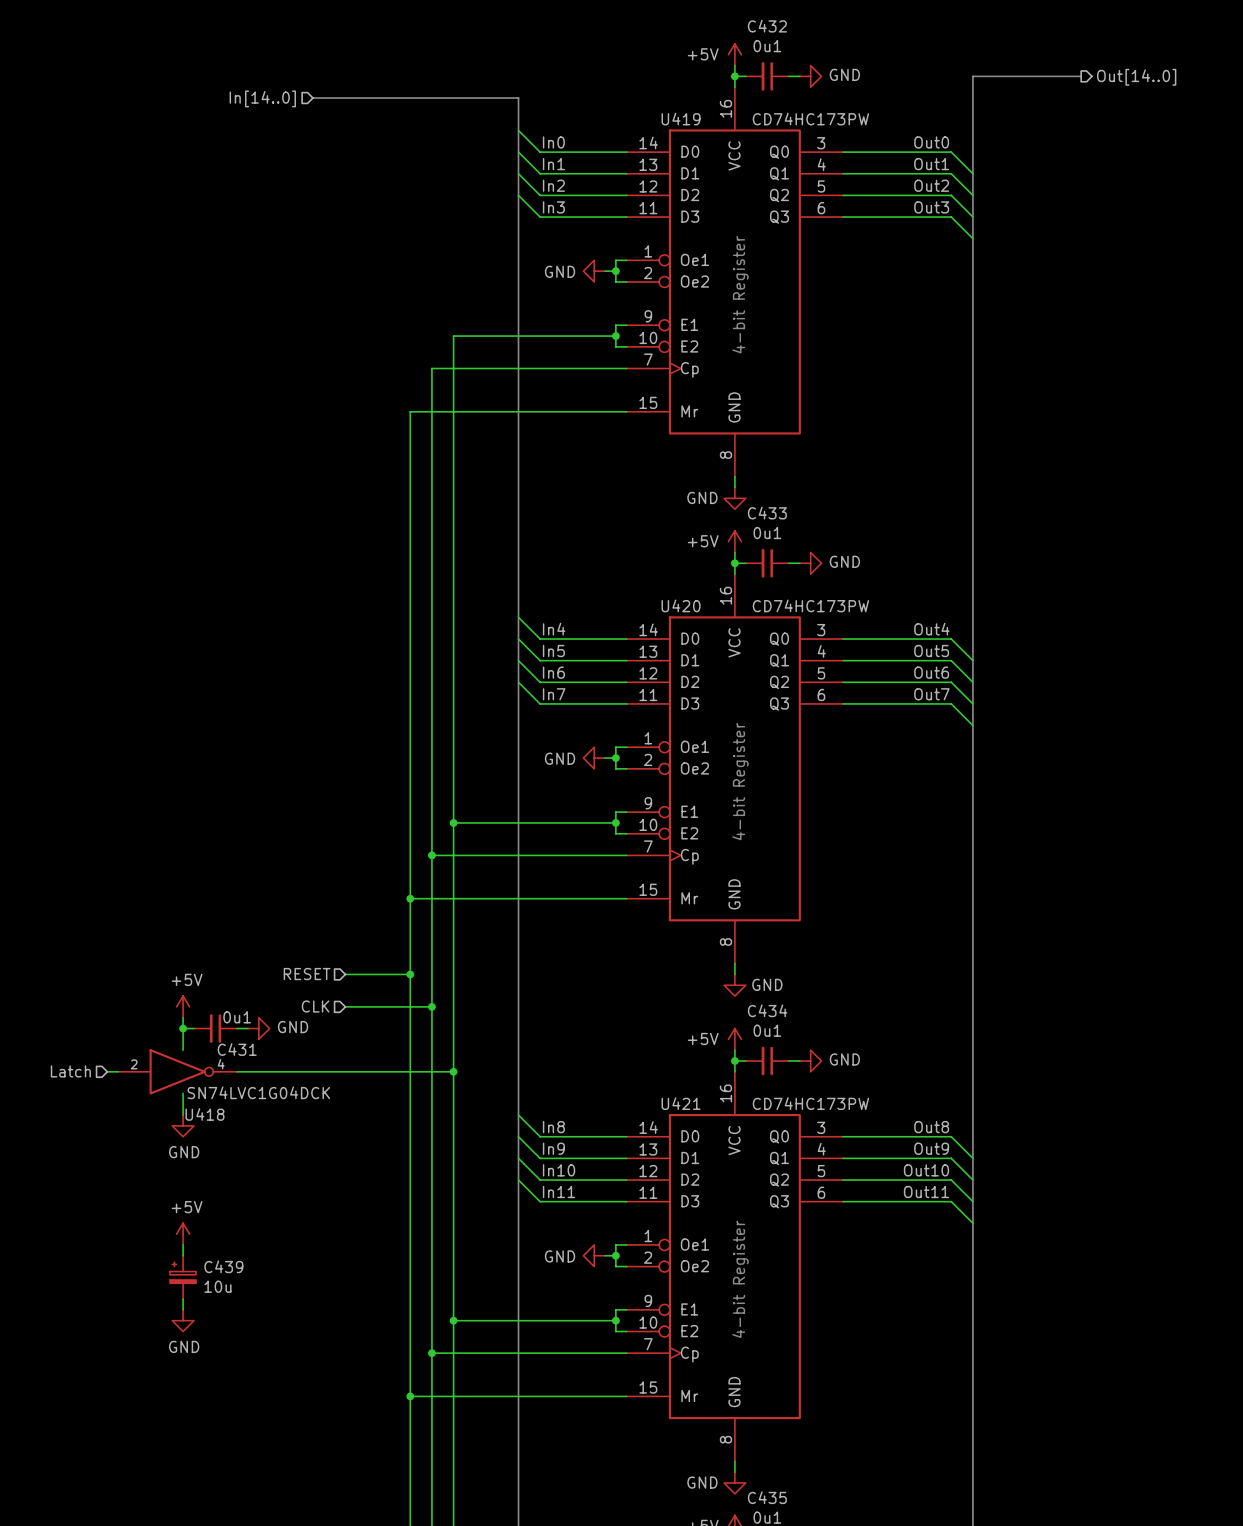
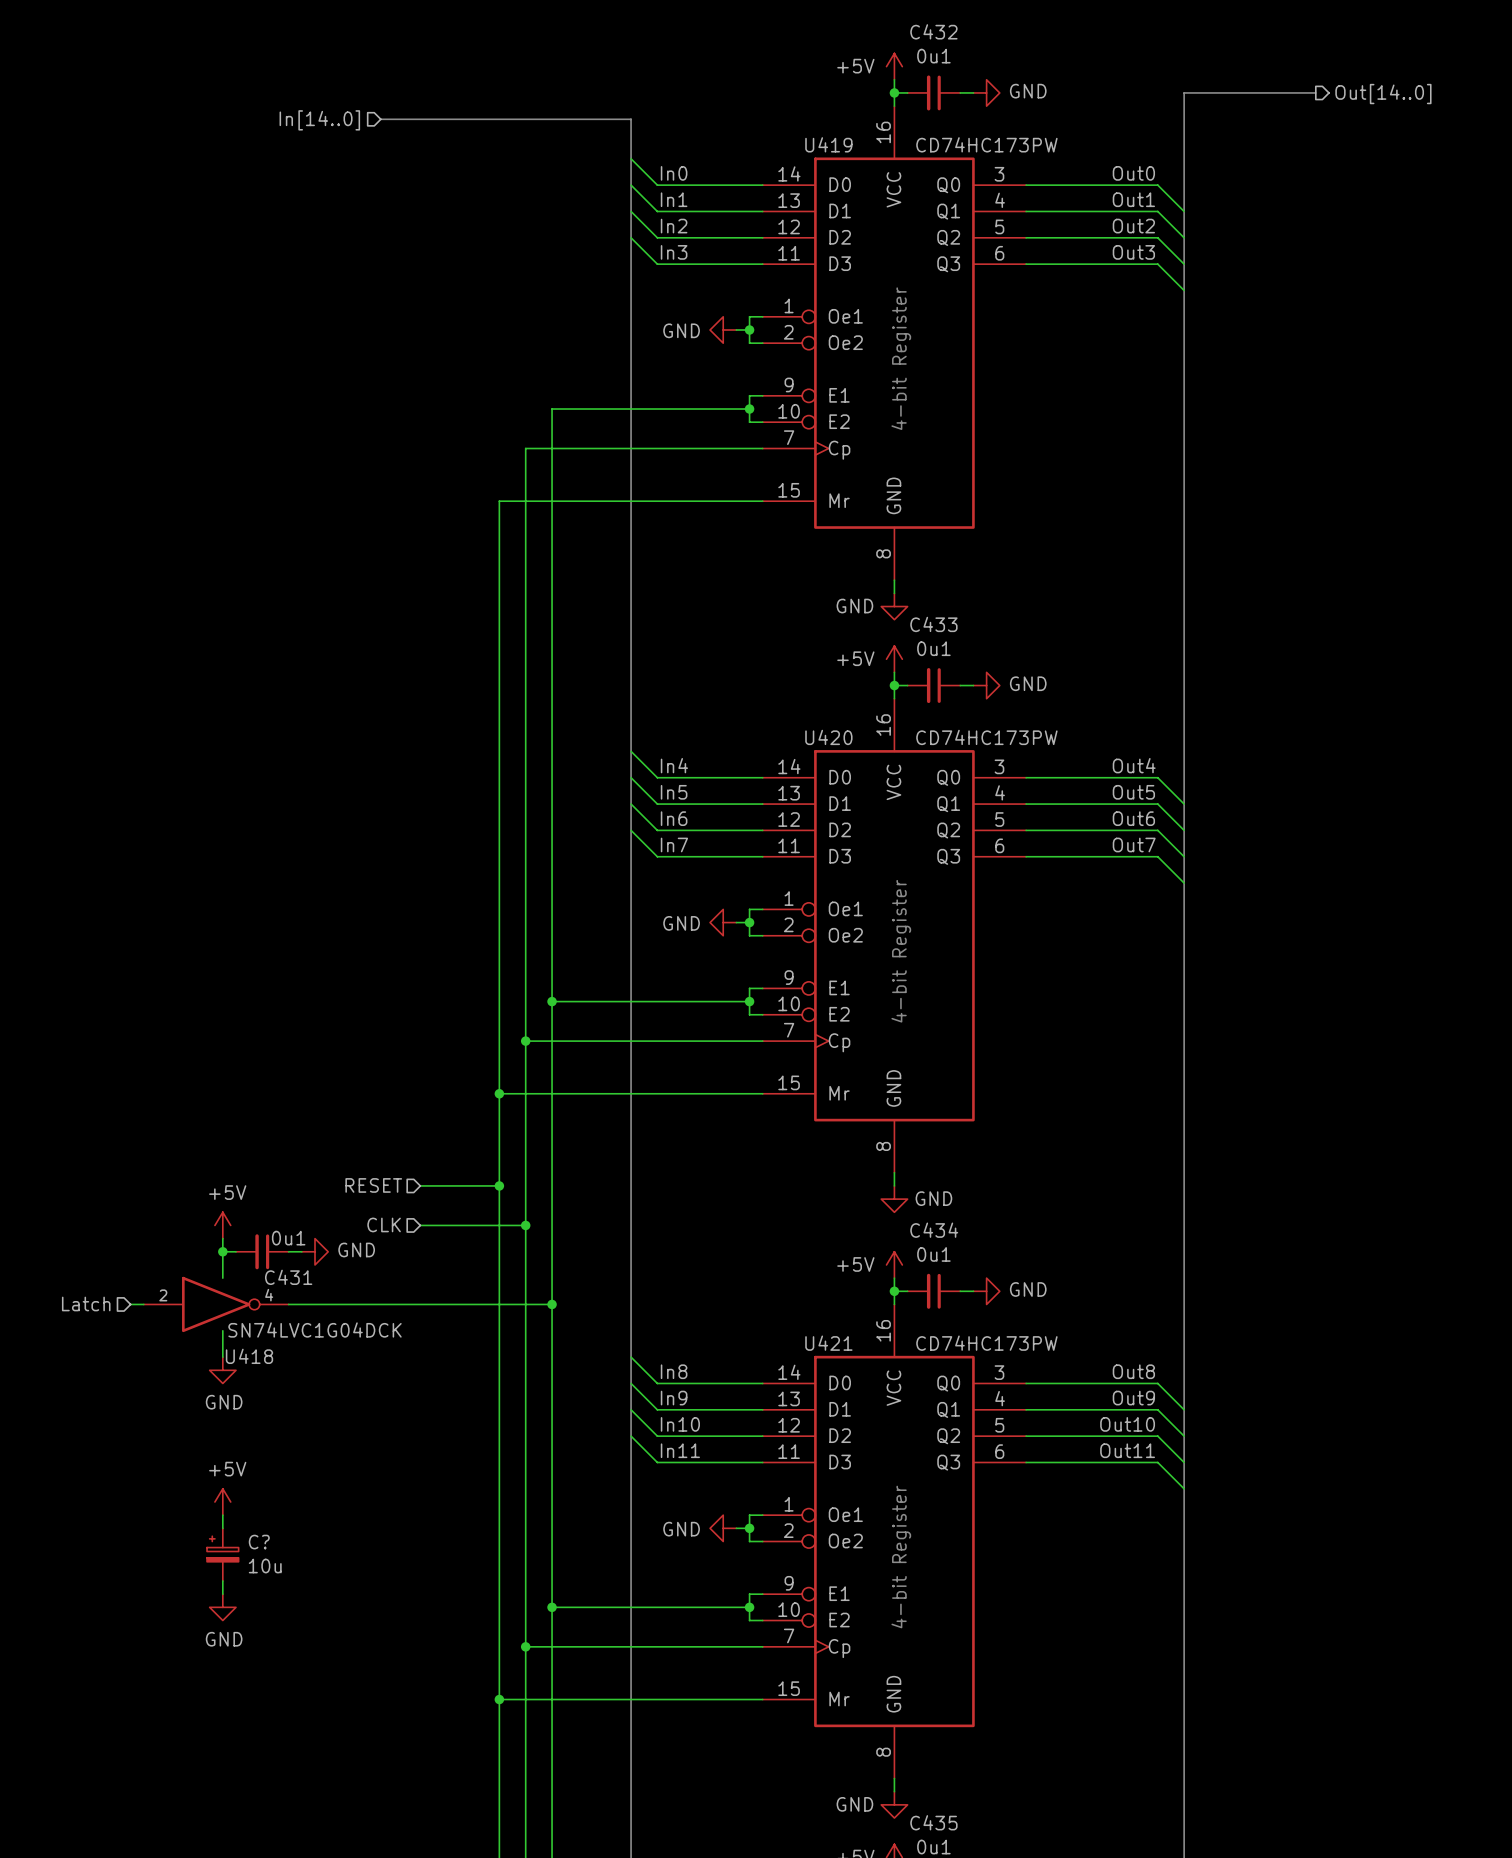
C439 name: C439 (223, 1266) -> C? (259, 1542)

